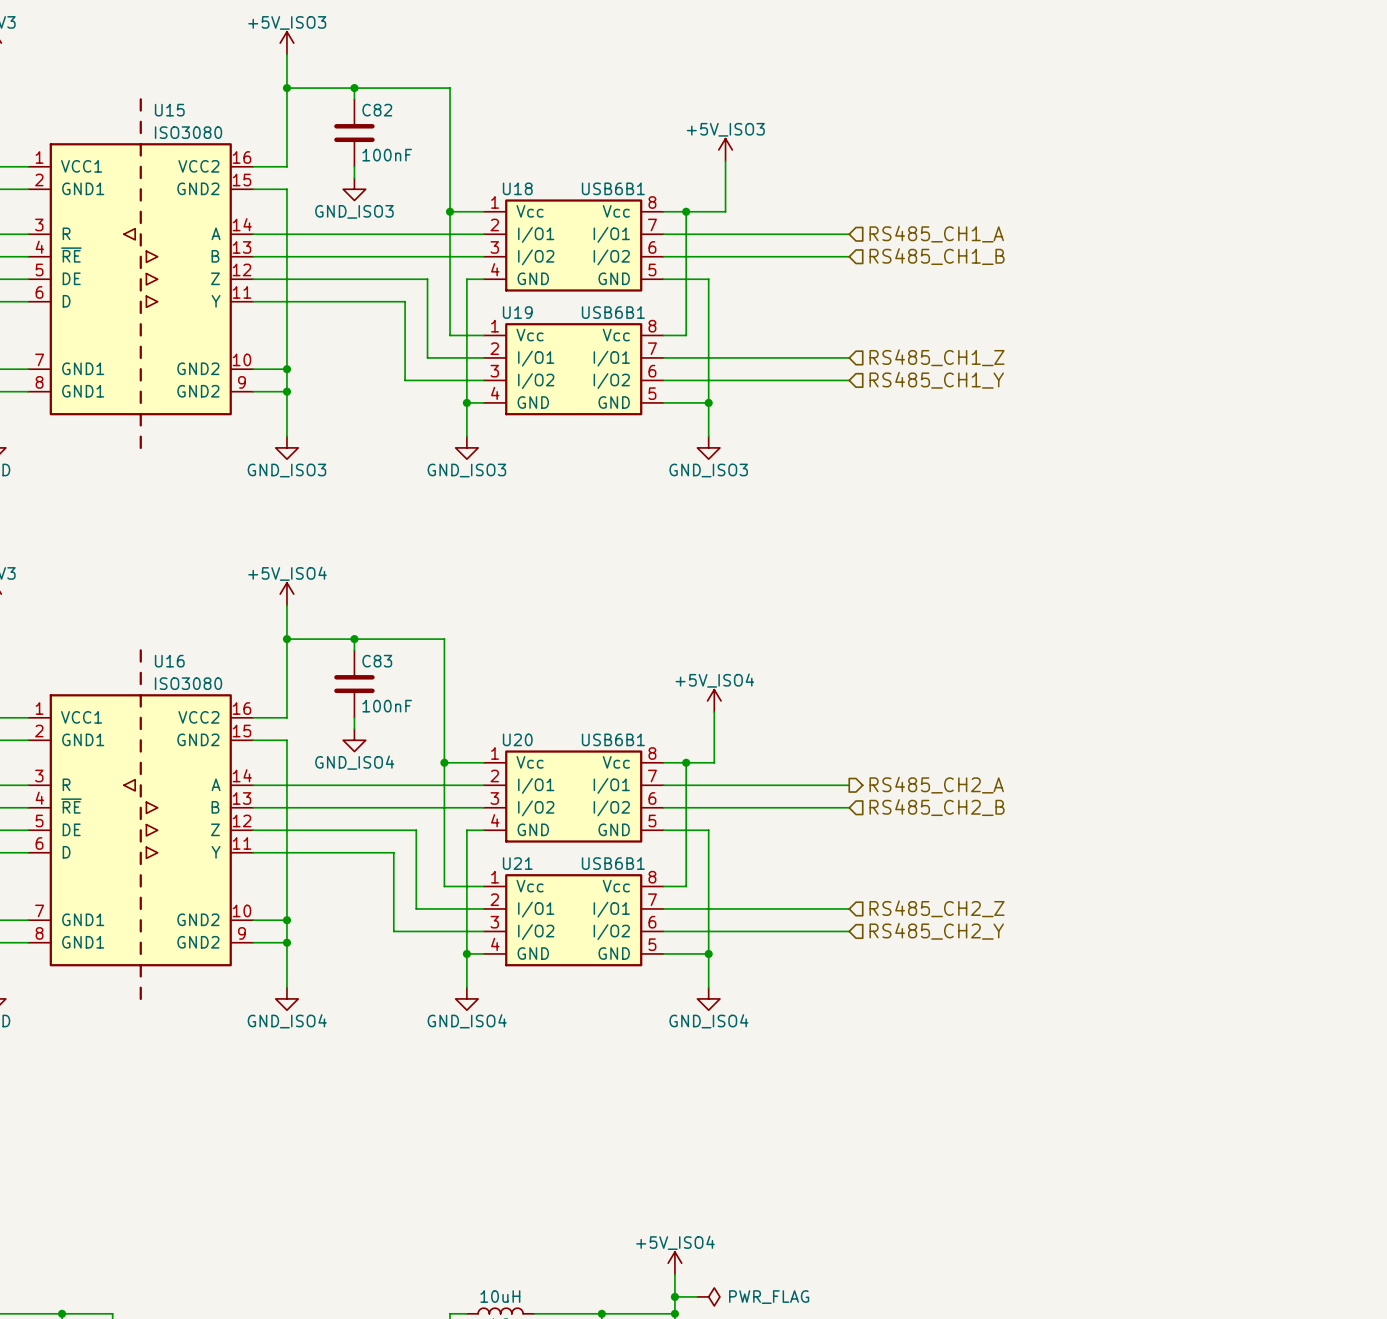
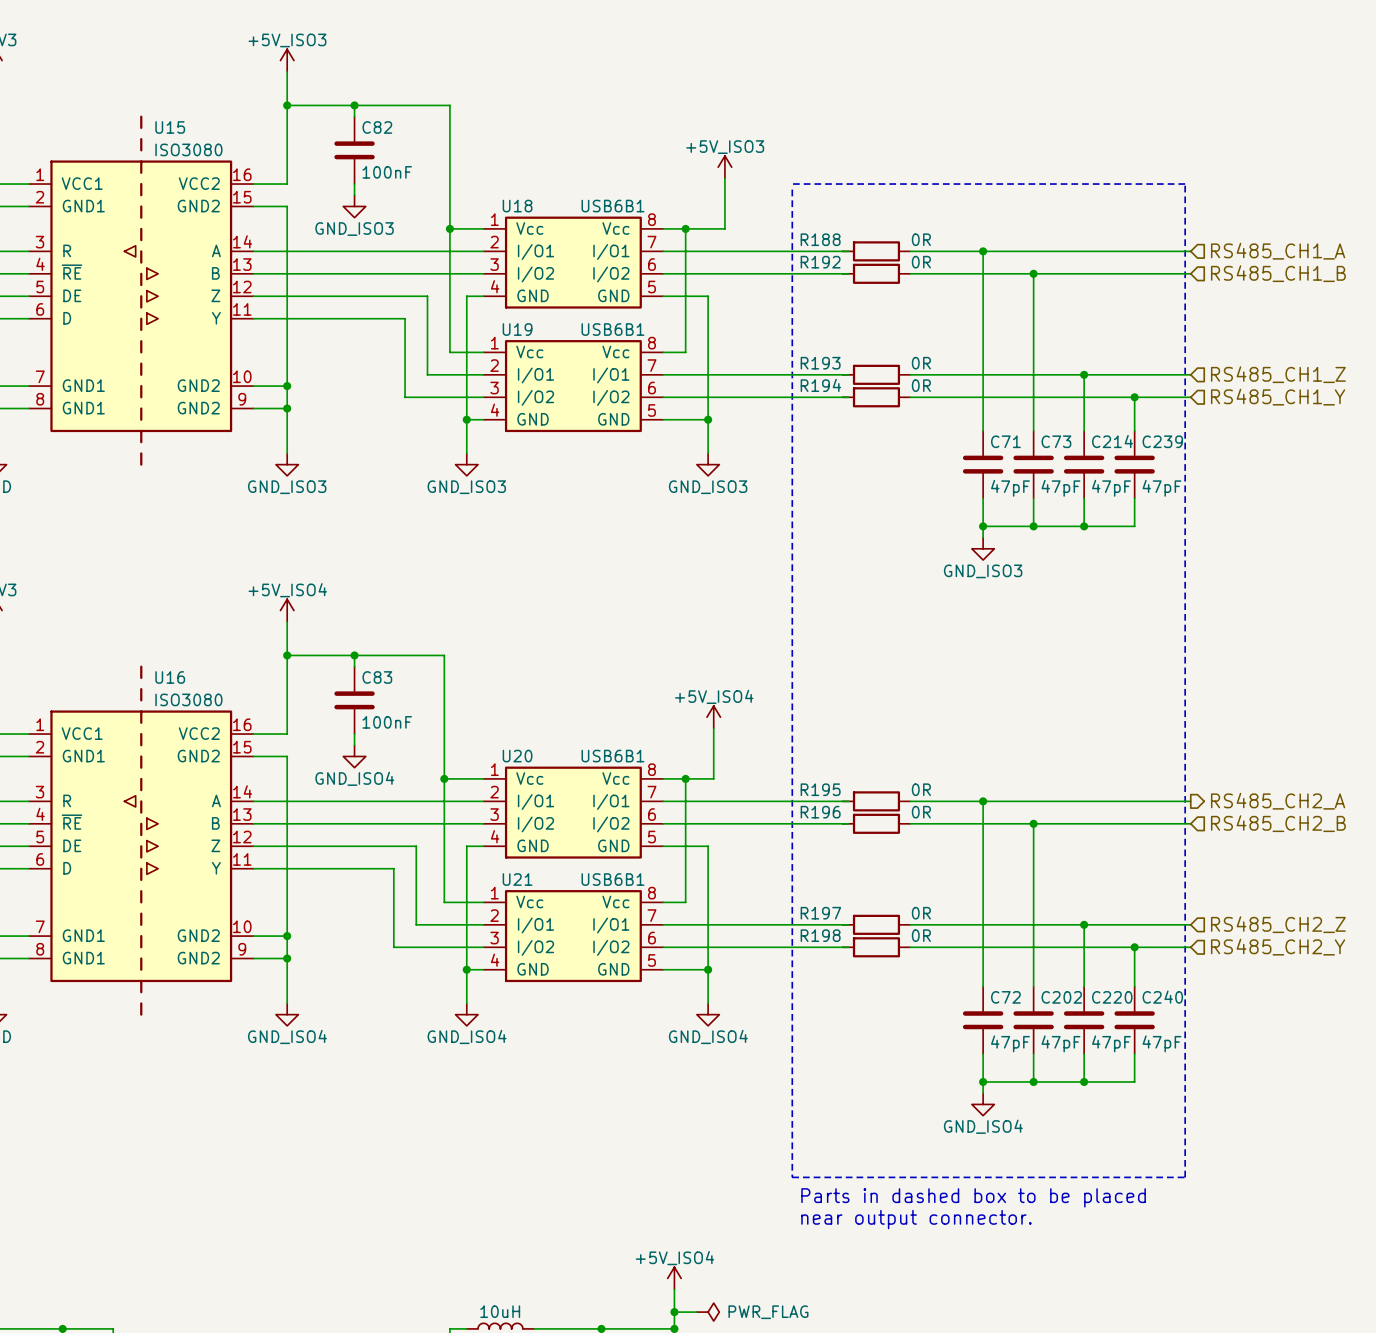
line: none -> (792, 184) (1185, 184) (1185, 1177) (792, 1177) (792, 189)
R188: none -> 0R (876, 251)
wire: none -> (910, 251) (1190, 251)
hierarchical label: RS485_CH1_A (936, 234) -> none
wire: none -> (983, 251) (983, 430)
junction: none -> (983, 251)
hierarchical label: none -> RS485_CH1_A (1278, 251)
R192: none -> 0R (876, 273)
wire: none -> (910, 273) (1190, 273)
hierarchical label: RS485_CH1_B (937, 256) -> none
wire: none -> (1033, 273) (1033, 430)
junction: none -> (1033, 273)
hierarchical label: none -> RS485_CH1_B (1278, 273)
R193: none -> 0R (876, 374)
wire: none -> (910, 374) (1190, 374)
hierarchical label: RS485_CH1_Z (937, 357) -> none
wire: none -> (1084, 374) (1084, 430)
junction: none -> (1084, 374)
hierarchical label: none -> RS485_CH1_Z (1278, 374)
R194: none -> 0R (876, 397)
wire: none -> (910, 397) (1190, 397)
hierarchical label: RS485_CH1_Y (936, 380) -> none
wire: none -> (1134, 397) (1134, 430)
junction: none -> (1134, 397)
hierarchical label: none -> RS485_CH1_Y (1278, 397)
C71: none -> 47pF (983, 464)
C73: none -> 47pF (1033, 464)
C214: none -> 47pF (1084, 464)
C239: none -> 47pF (1134, 464)
wire: none -> (983, 498) (983, 537)
wire: none -> (1033, 498) (1033, 526)
wire: none -> (1084, 498) (1084, 526)
wire: none -> (1134, 498) (1134, 526) (983, 526)
junction: none -> (983, 526)
junction: none -> (1033, 526)
junction: none -> (1084, 526)
power symbol: none -> GND_ISO3 (983, 548)
R195: none -> 0R (876, 801)
wire: none -> (910, 801) (1190, 801)
hierarchical label: RS485_CH2_A (936, 785) -> none
wire: none -> (983, 801) (983, 986)
junction: none -> (983, 801)
hierarchical label: none -> RS485_CH2_A (1278, 801)
R196: none -> 0R (876, 823)
wire: none -> (910, 823) (1190, 823)
hierarchical label: RS485_CH2_B (937, 807) -> none
wire: none -> (1033, 823) (1033, 986)
junction: none -> (1033, 823)
hierarchical label: none -> RS485_CH2_B (1278, 823)
R197: none -> 0R (876, 924)
wire: none -> (910, 924) (1190, 924)
hierarchical label: RS485_CH2_Z (937, 908) -> none
wire: none -> (1084, 924) (1084, 986)
junction: none -> (1084, 924)
hierarchical label: none -> RS485_CH2_Z (1278, 924)
R198: none -> 0R (876, 947)
wire: none -> (910, 947) (1190, 947)
hierarchical label: RS485_CH2_Y (936, 931) -> none
wire: none -> (1134, 947) (1134, 986)
junction: none -> (1134, 947)
hierarchical label: none -> RS485_CH2_Y (1278, 947)
C72: none -> 47pF (983, 1020)
C202: none -> 47pF (1033, 1020)
C220: none -> 47pF (1084, 1020)
C240: none -> 47pF (1134, 1020)
wire: none -> (983, 1053) (983, 1093)
wire: none -> (1033, 1053) (1033, 1081)
wire: none -> (1084, 1053) (1084, 1081)
wire: none -> (1134, 1053) (1134, 1081) (983, 1081)
junction: none -> (983, 1081)
junction: none -> (1033, 1081)
junction: none -> (1084, 1081)
power symbol: none -> GND_ISO4 (983, 1104)
text: none -> Parts in dashed box to be placed (973, 1197)
text: none -> near output connector. (916, 1219)

